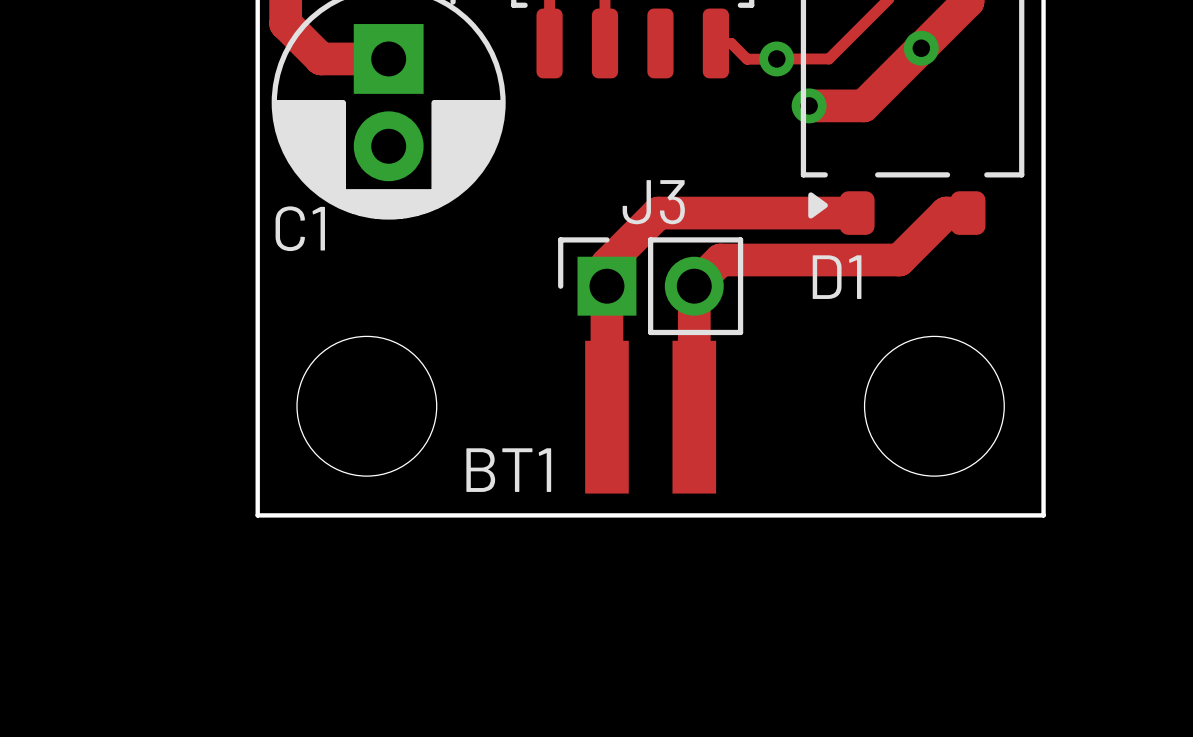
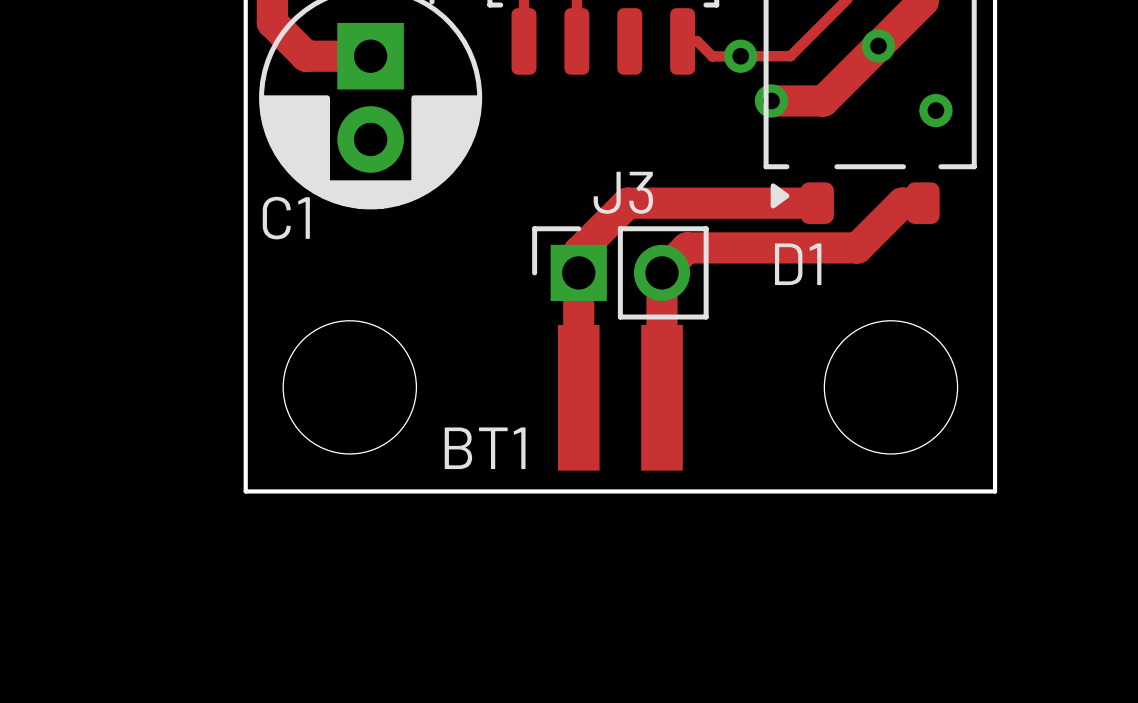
via: none -> (935, 110)

